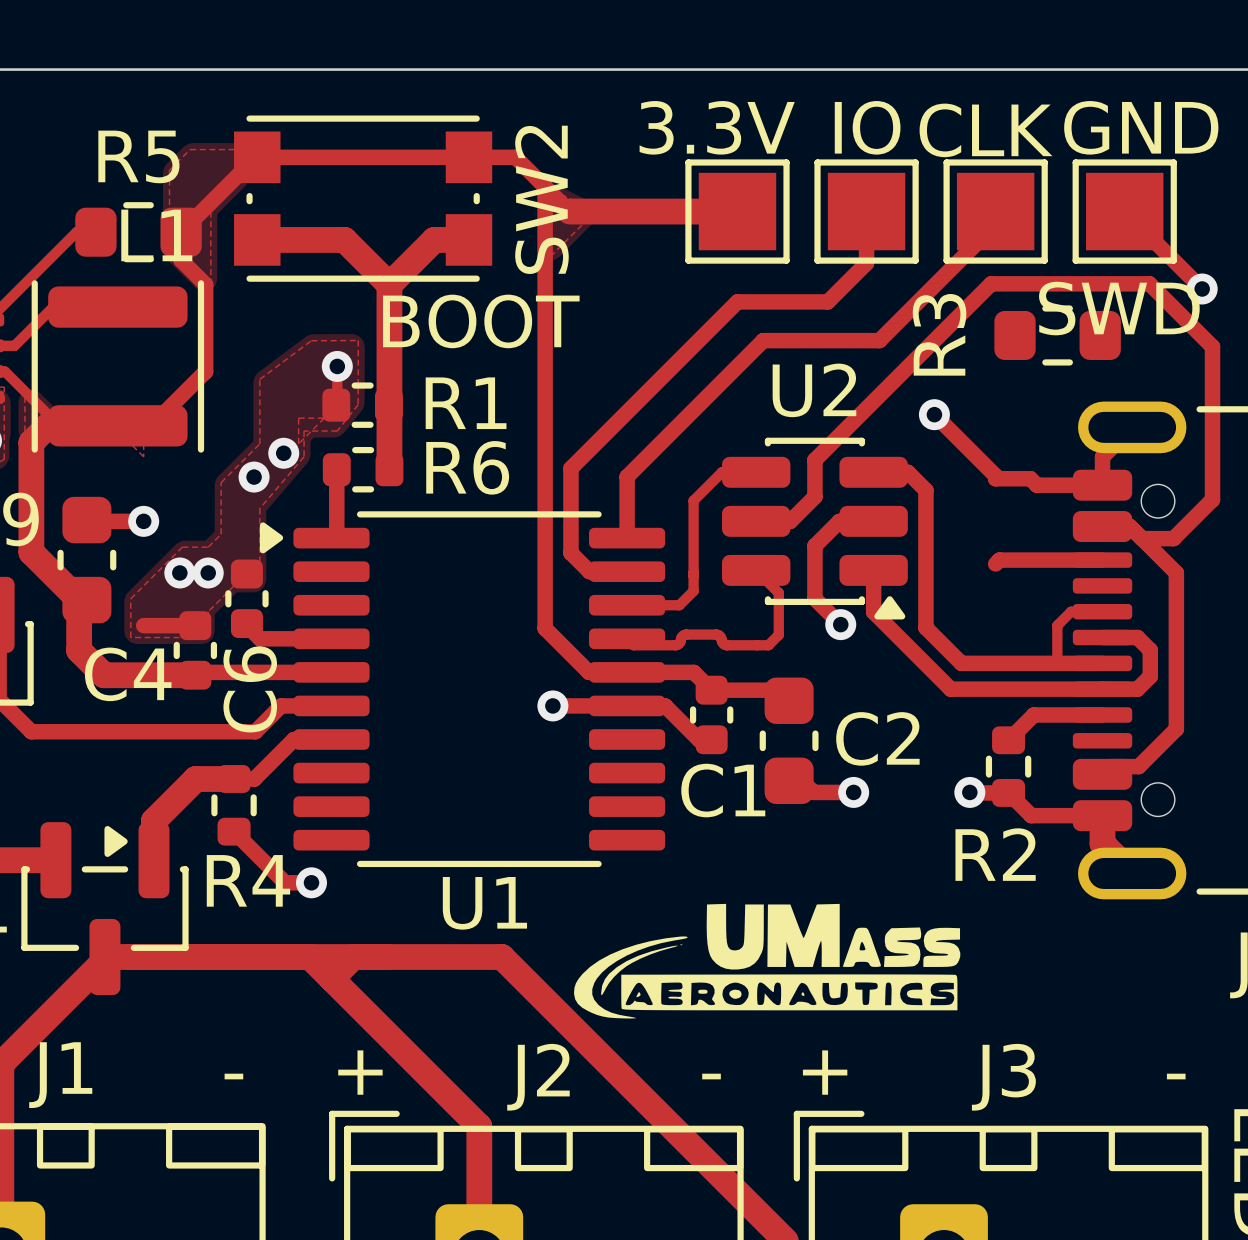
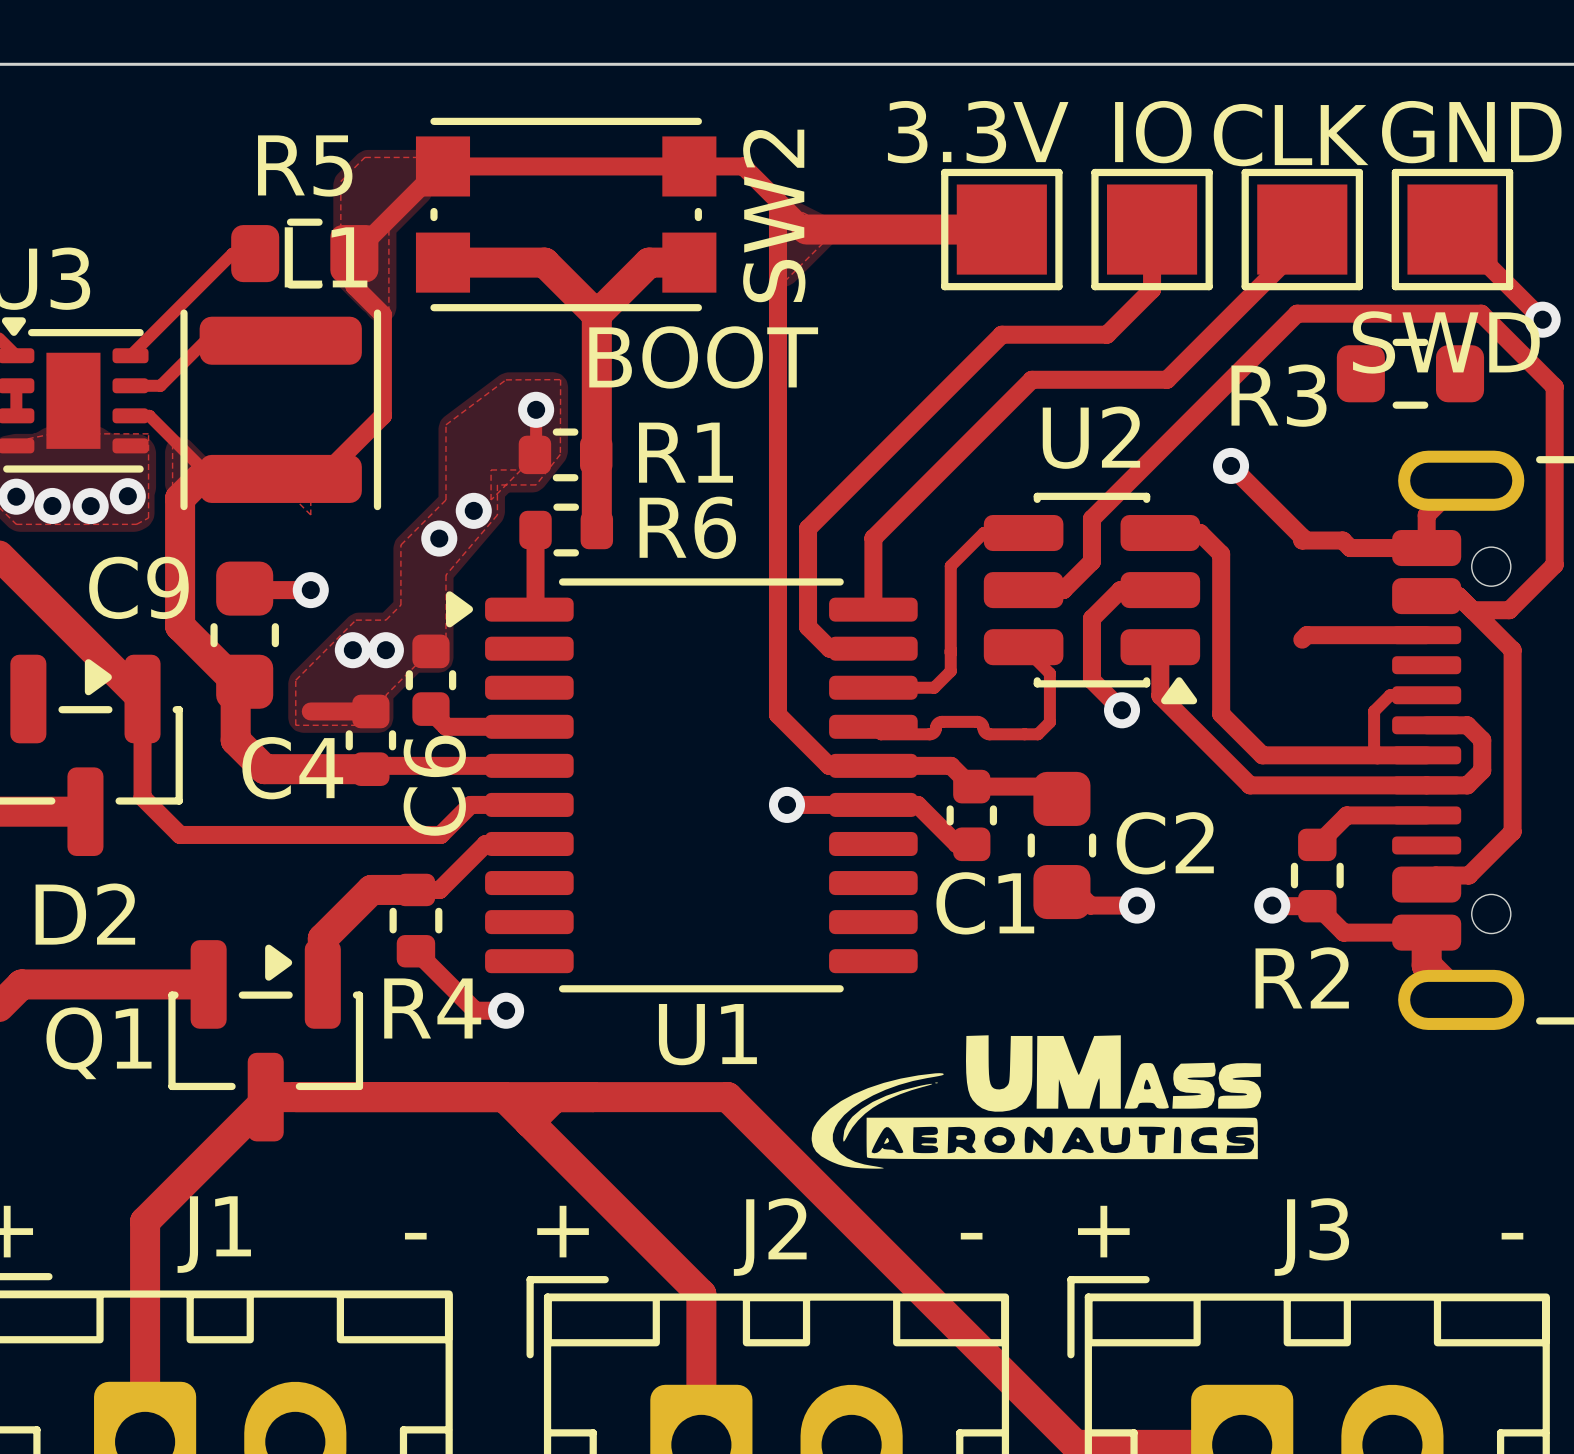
R3 name rotation: 0° (939, 334) -> 90° clockwise (1278, 395)
R3 position: (1057, 335) -> (1410, 373)

